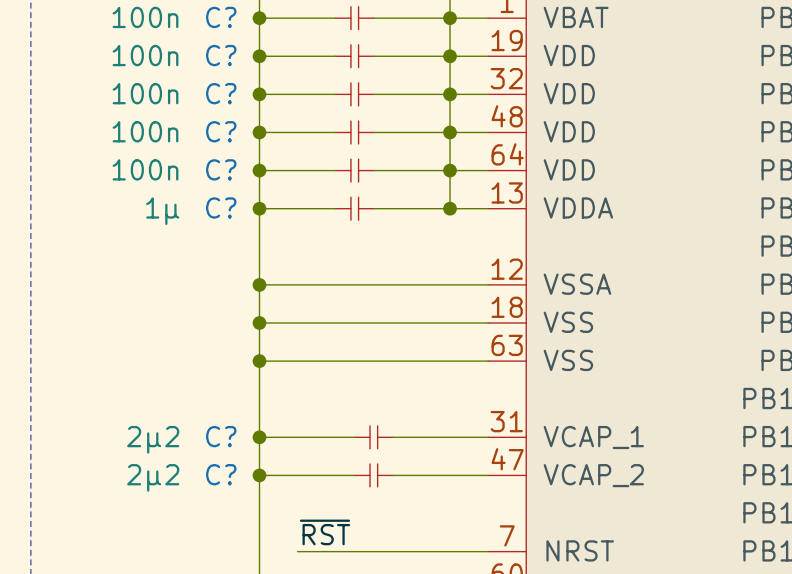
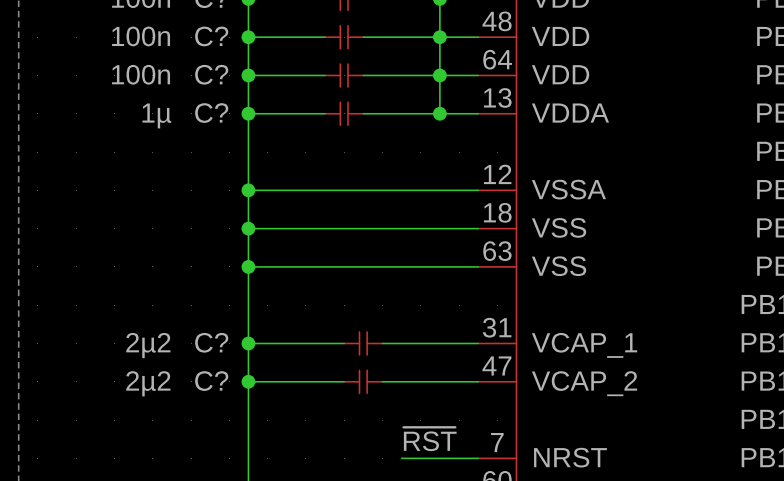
label position: ~{RST} (325, 532) -> ~{RST} (430, 439)
wire: (297, 551) (411, 551) -> none

